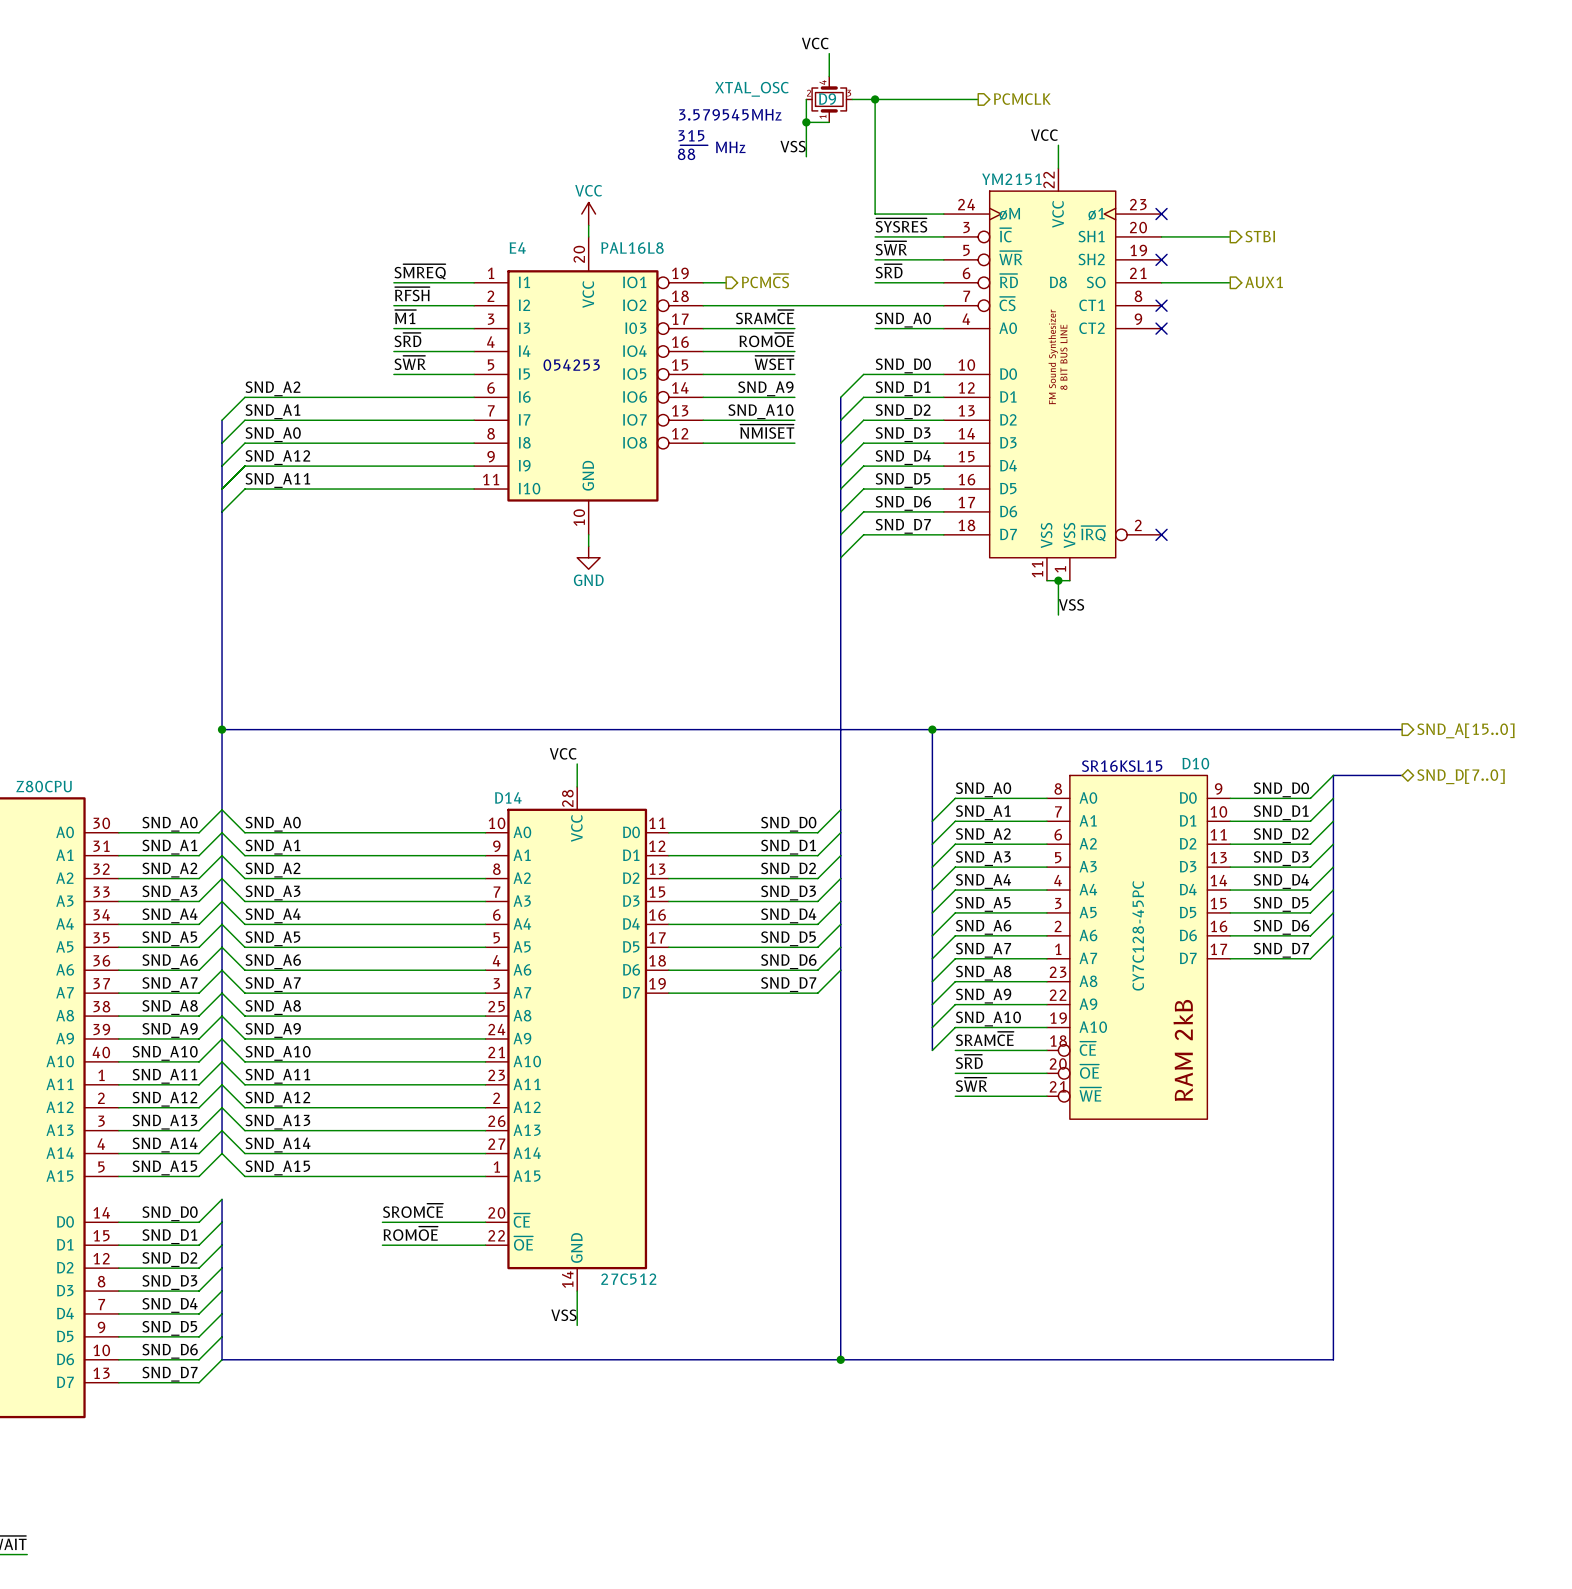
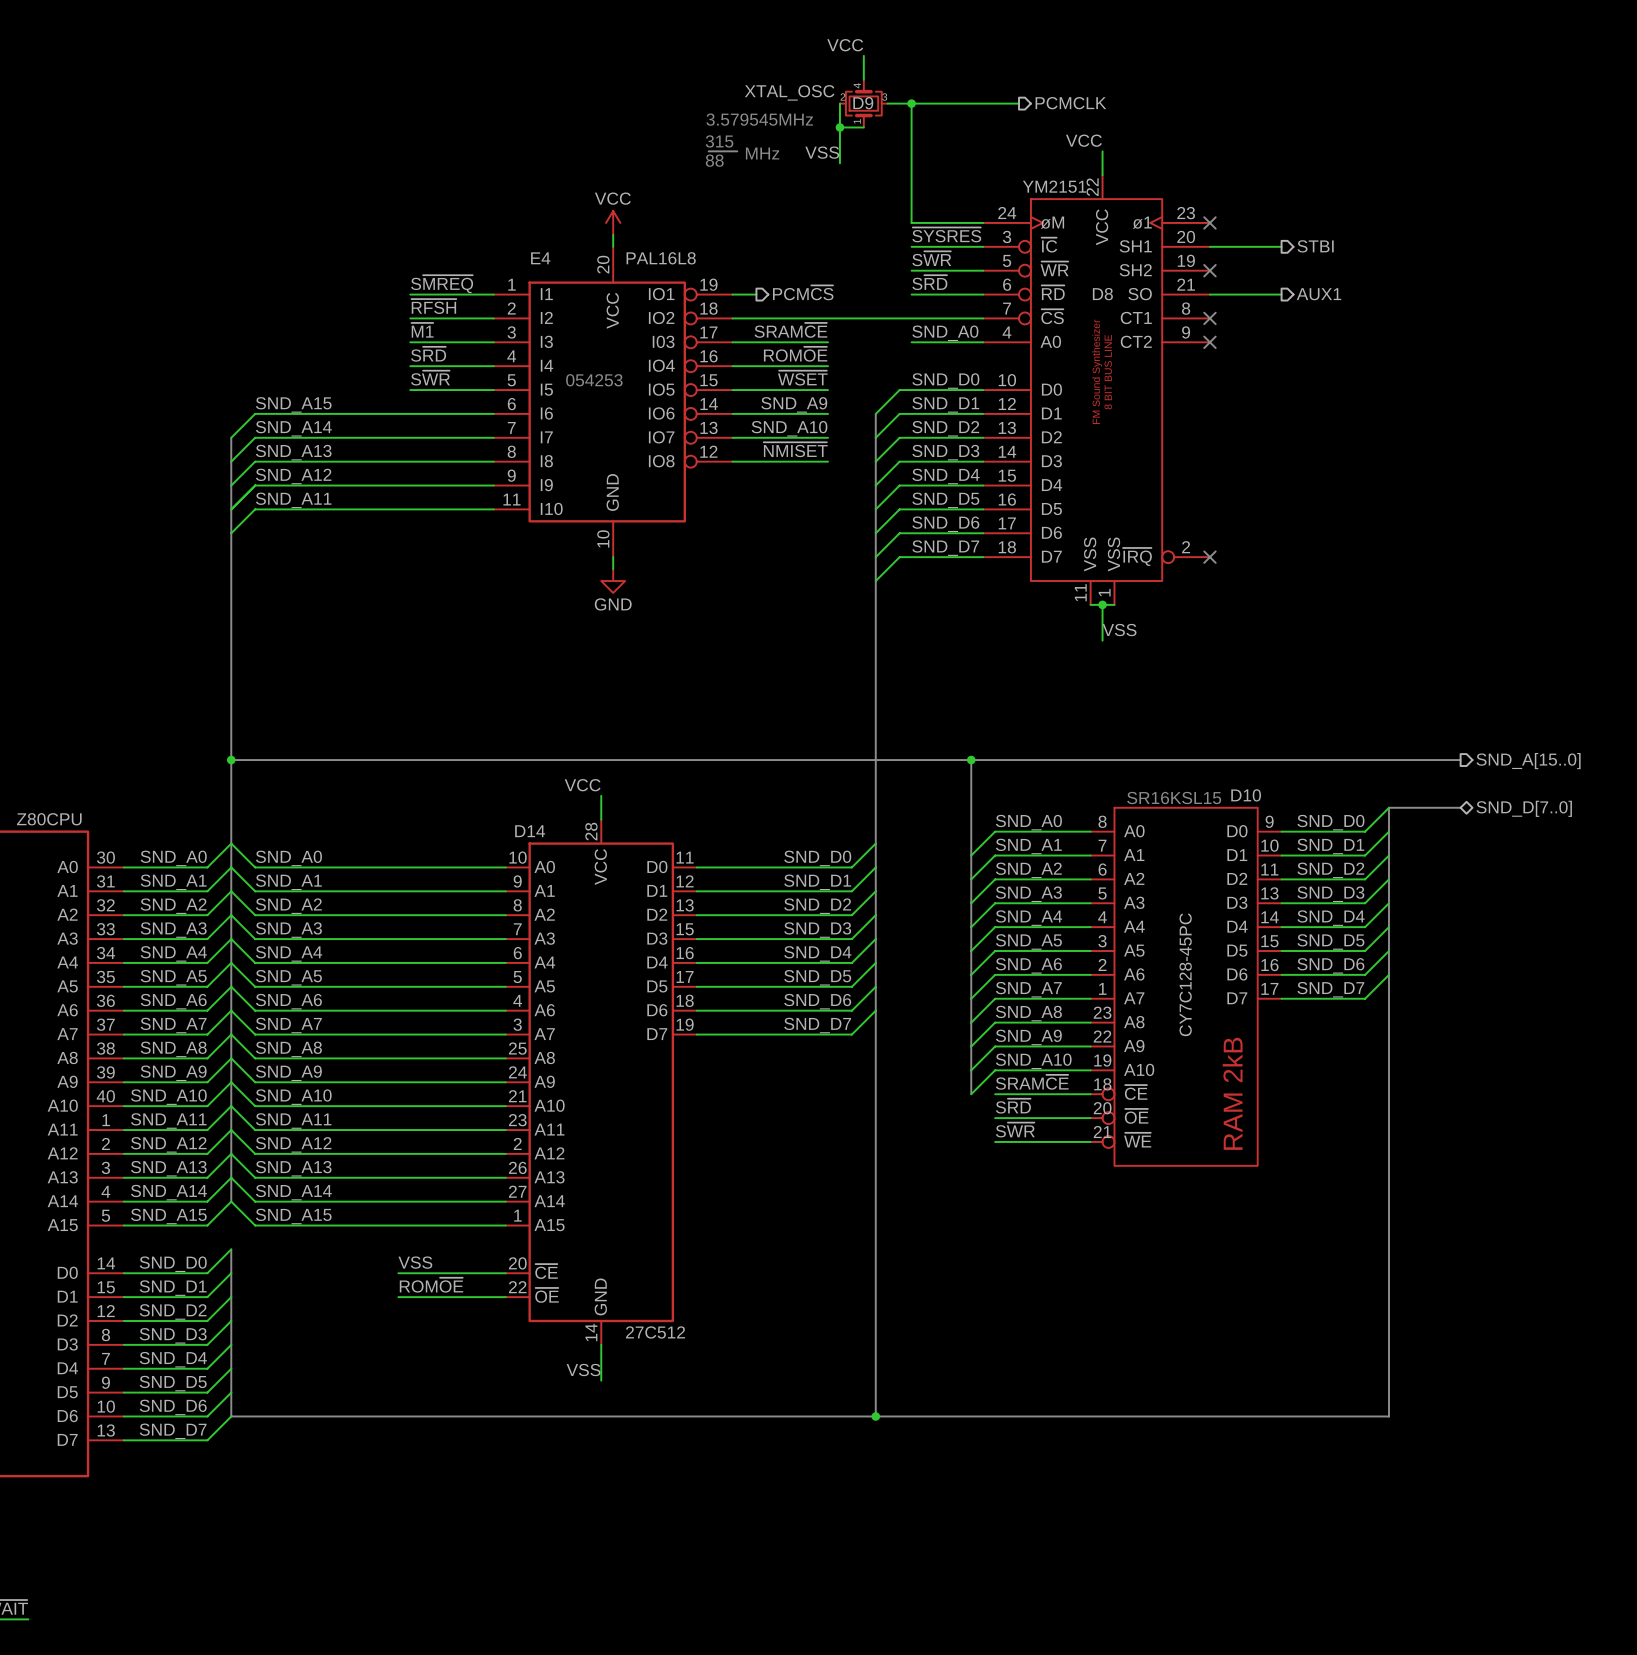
label: SND_A2 (272, 388) -> SND_A15 (293, 404)
label: SND_A1 (272, 411) -> SND_A14 (293, 428)
label: SND_A0 (273, 434) -> SND_A13 (293, 452)
label: SROM~{CE} (413, 1210) -> VSS (415, 1262)

